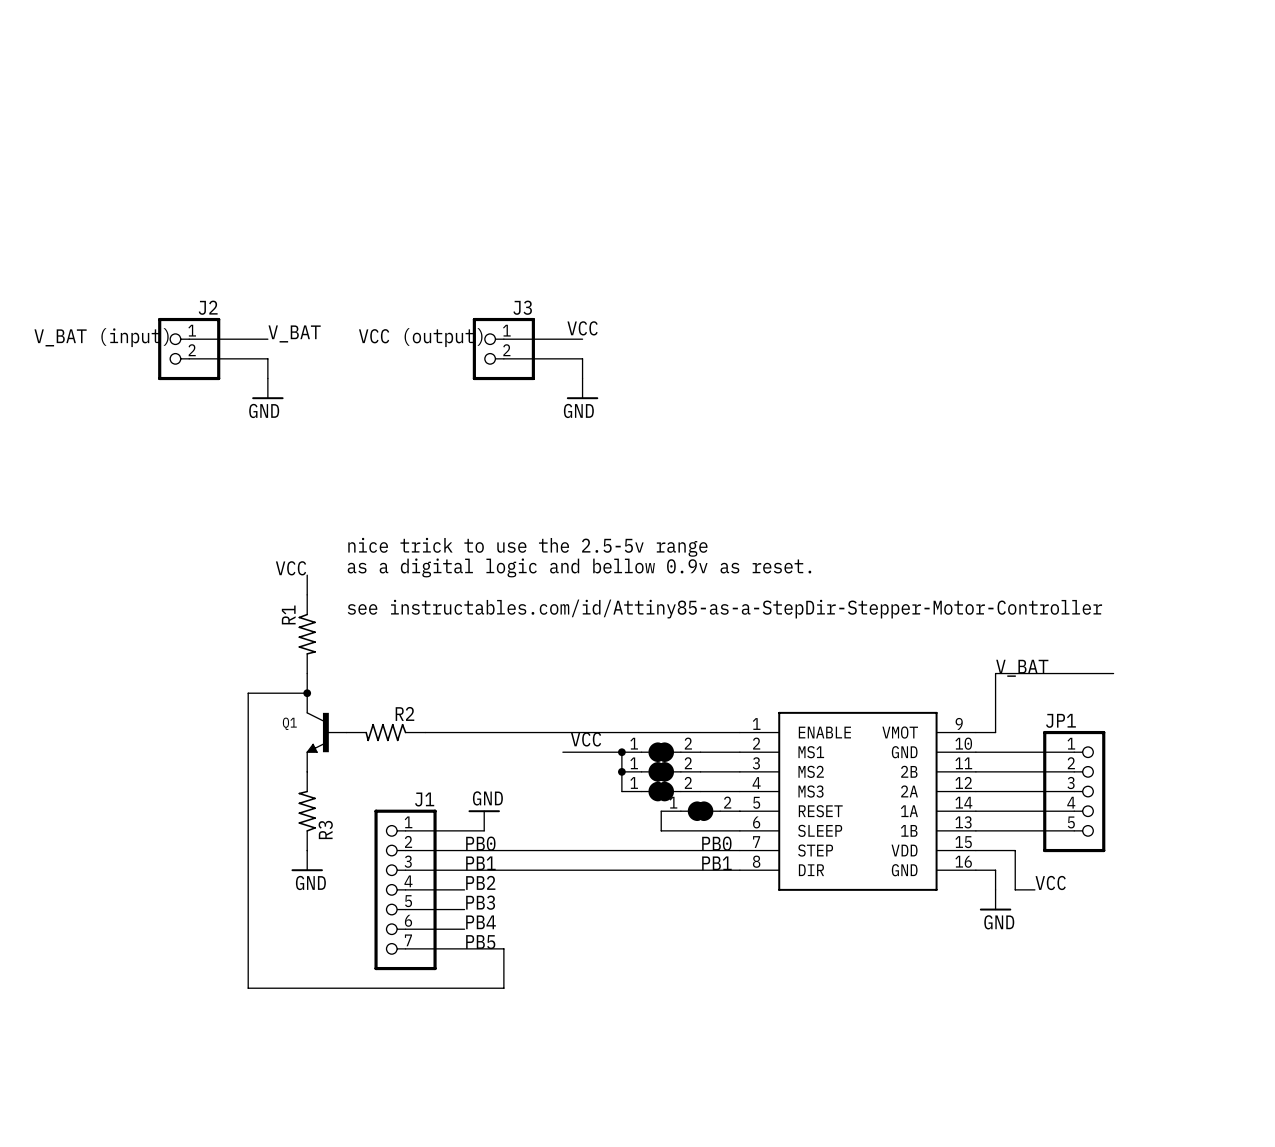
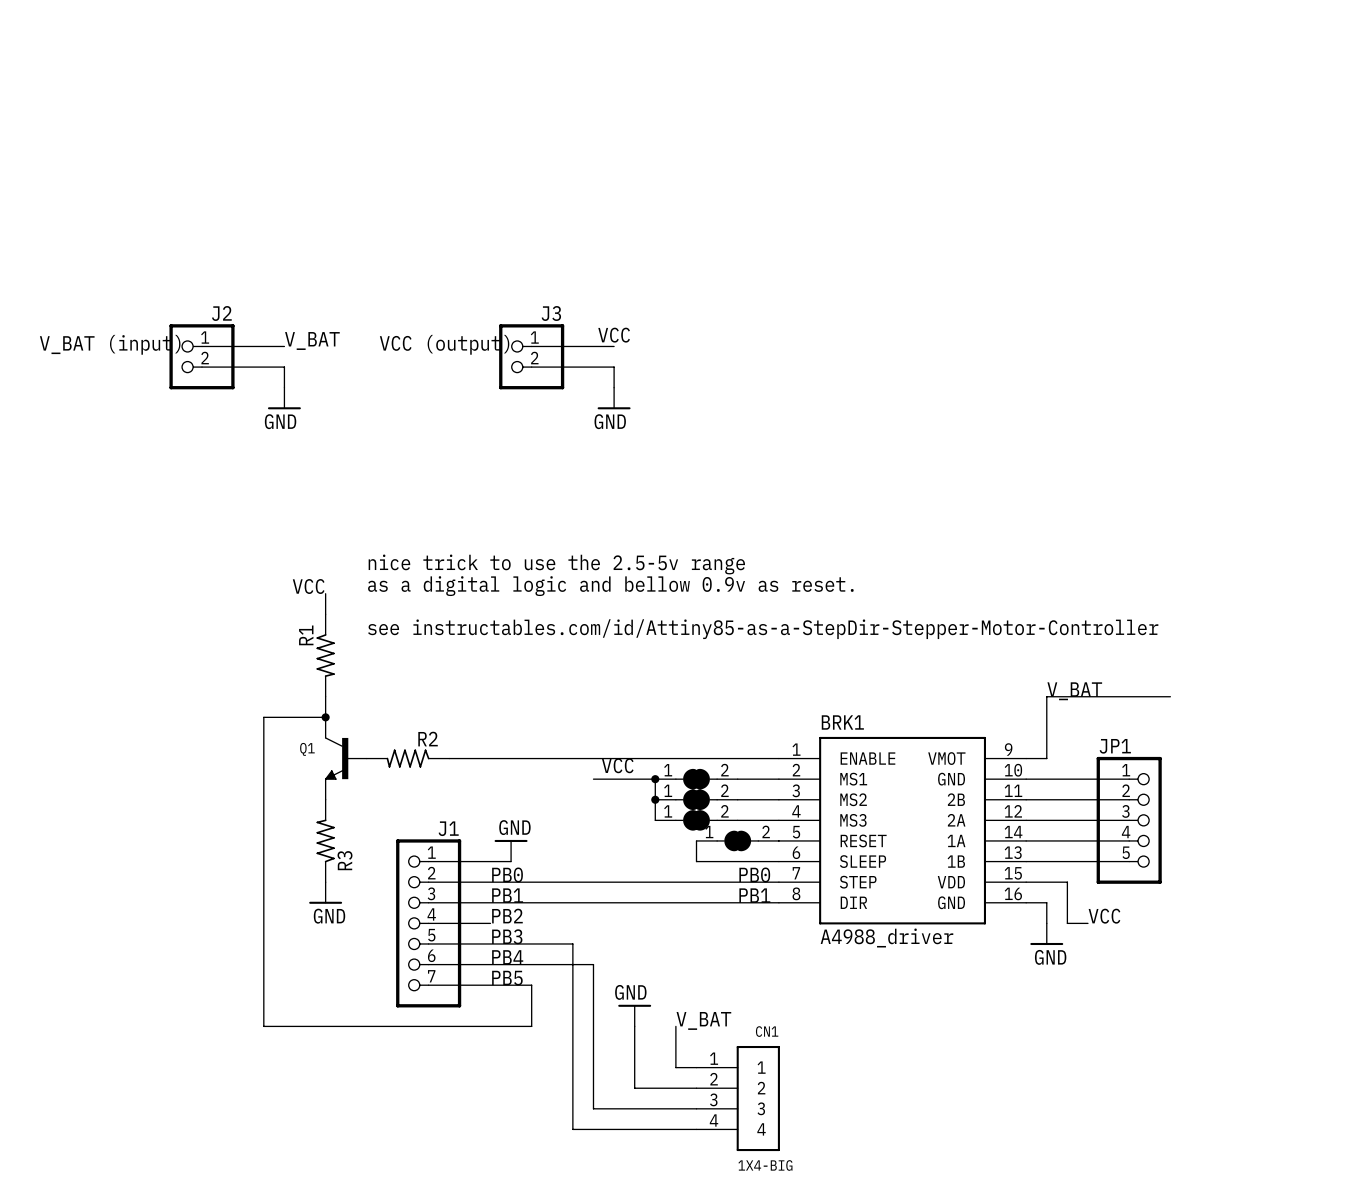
BRK1 name: none -> BRK1 (842, 722)
BRK1 value: none -> A4988_driver (886, 938)
wire: none -> (490, 943) (572, 943) (572, 1129) (696, 1129)
wire: none -> (490, 964) (593, 964) (593, 1108) (696, 1108)
power symbol: none -> GND (634, 1015)
label: none -> V_BAT (703, 1020)
wire: none -> (634, 1026) (634, 1088) (696, 1088)
wire: none -> (675, 1026) (675, 1067) (696, 1067)
CN1: none -> 1X4-BIG (738, 1098)

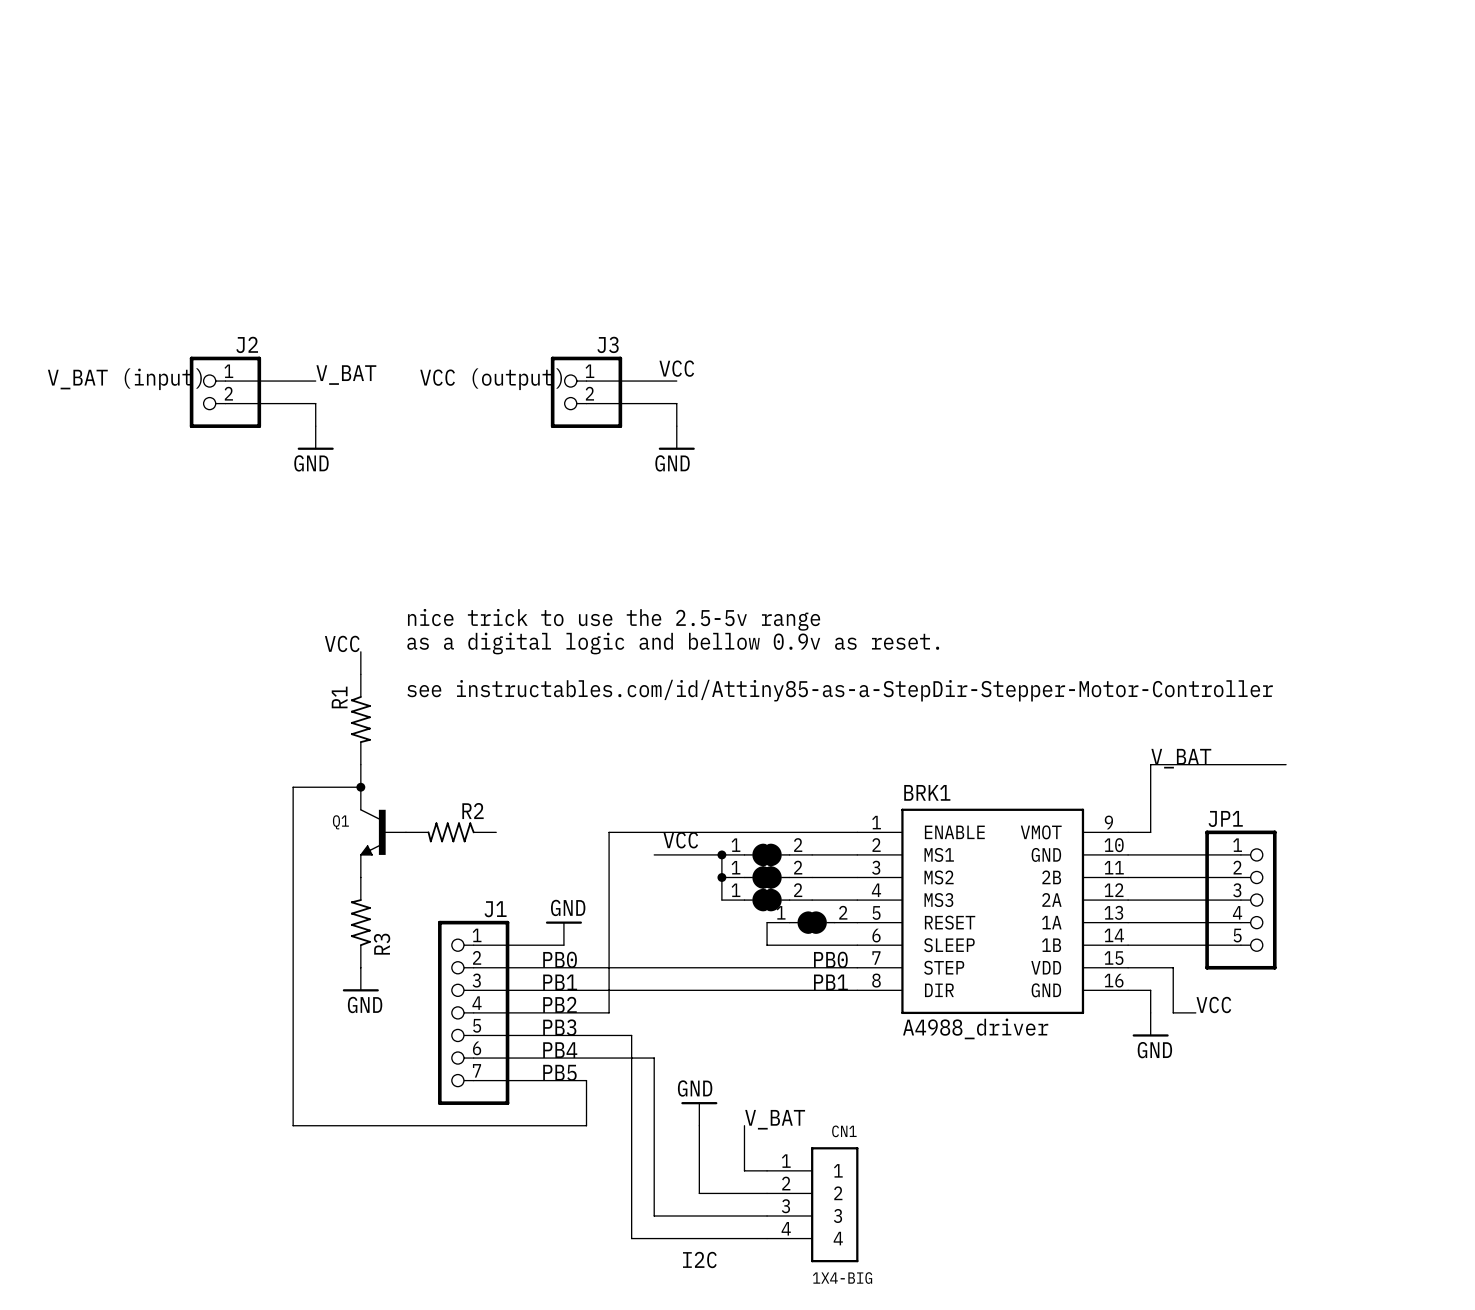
wire: (449, 758) (552, 758) -> (541, 1012) (609, 1012) (609, 832)
BRK1 pin number: 14 (1013, 832) -> 13 (1113, 912)
BRK1 pin number: 13 (1013, 852) -> 14 (1114, 935)
text: none -> I2C (699, 1260)

